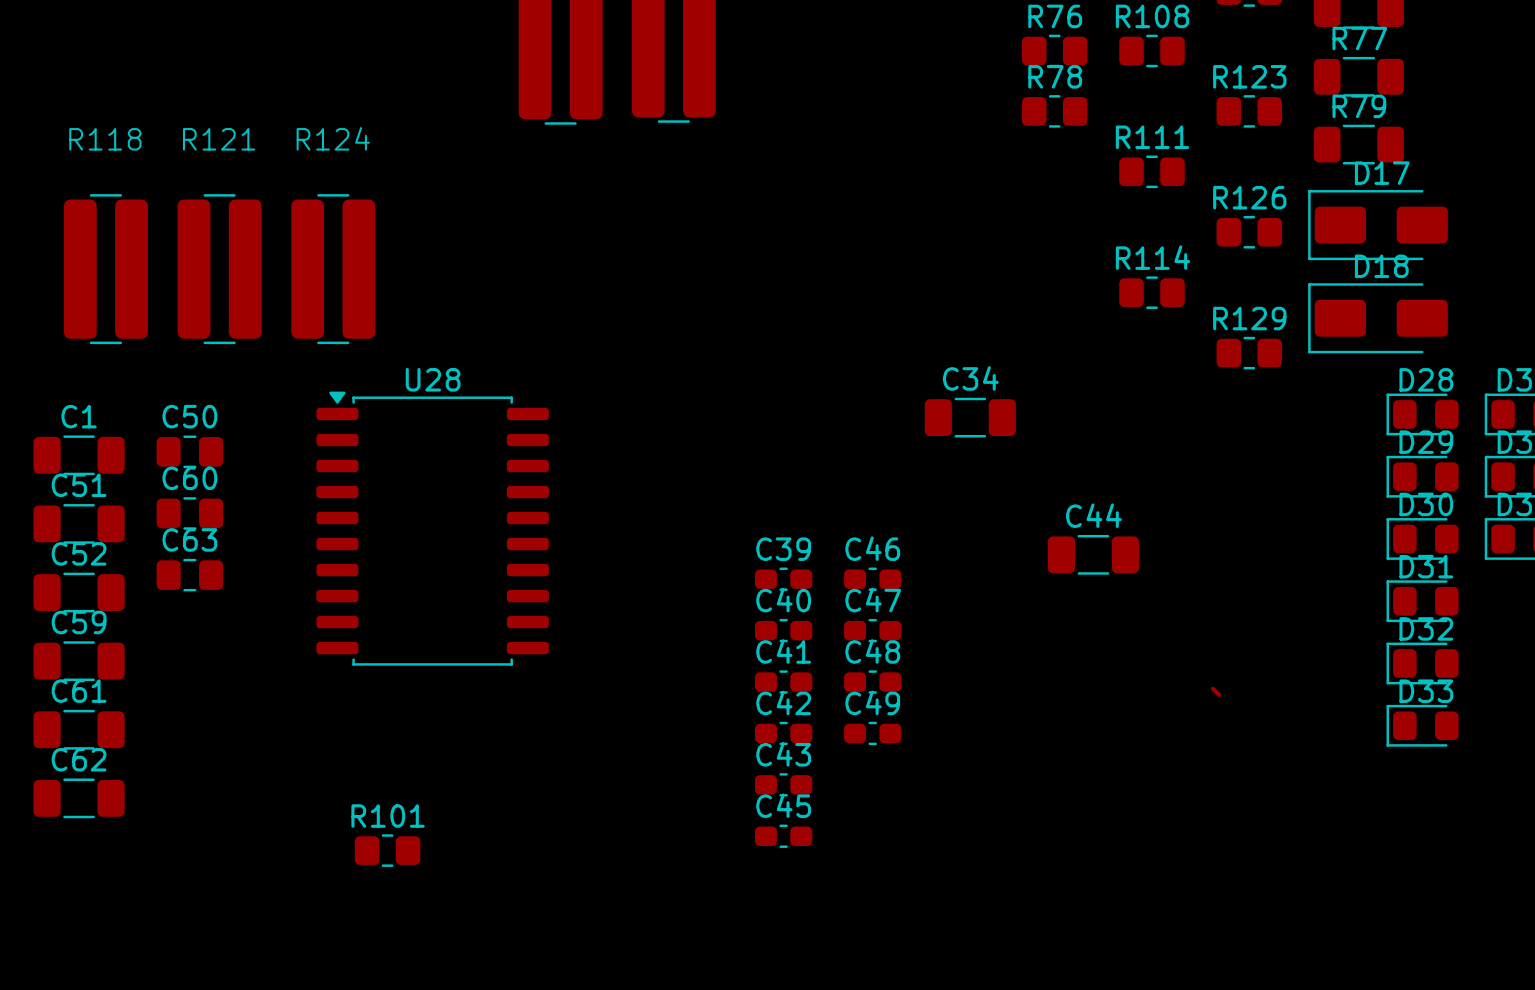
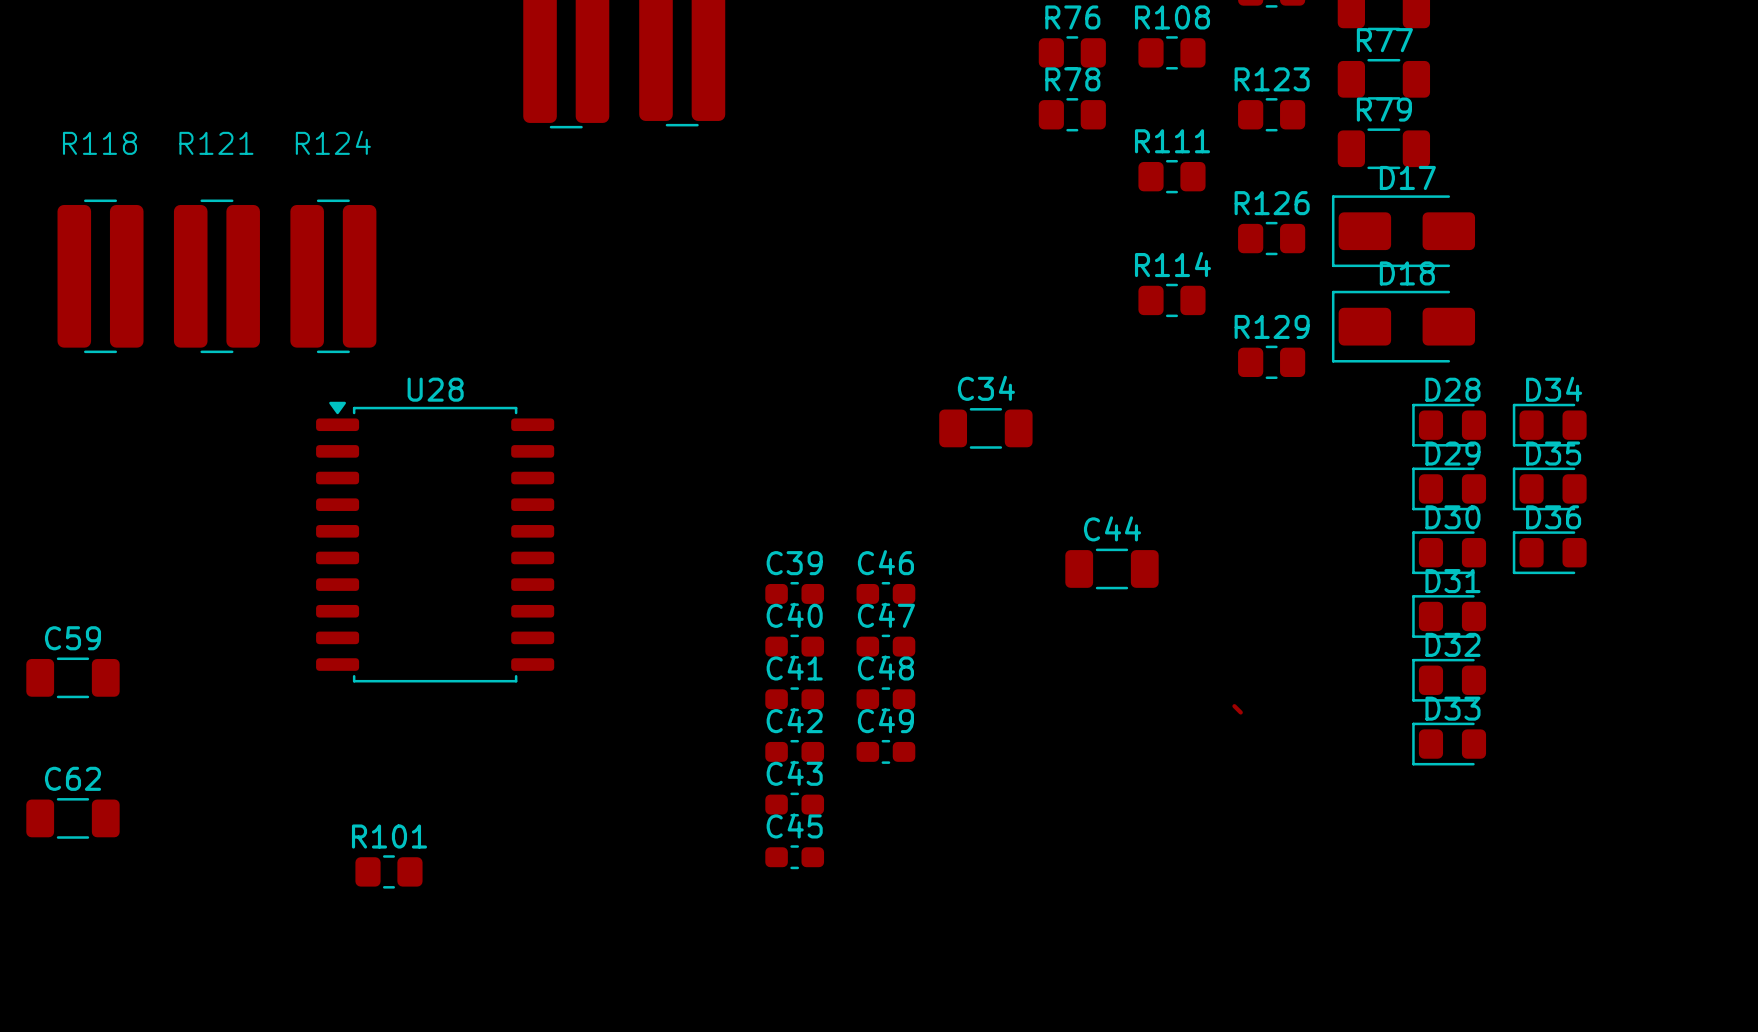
C50: (189, 451) -> none
C1: (79, 455) -> none
C60: (189, 513) -> none
C51: (79, 523) -> none
C63: (189, 575) -> none
C52: (79, 592) -> none
C61: (79, 729) -> none

